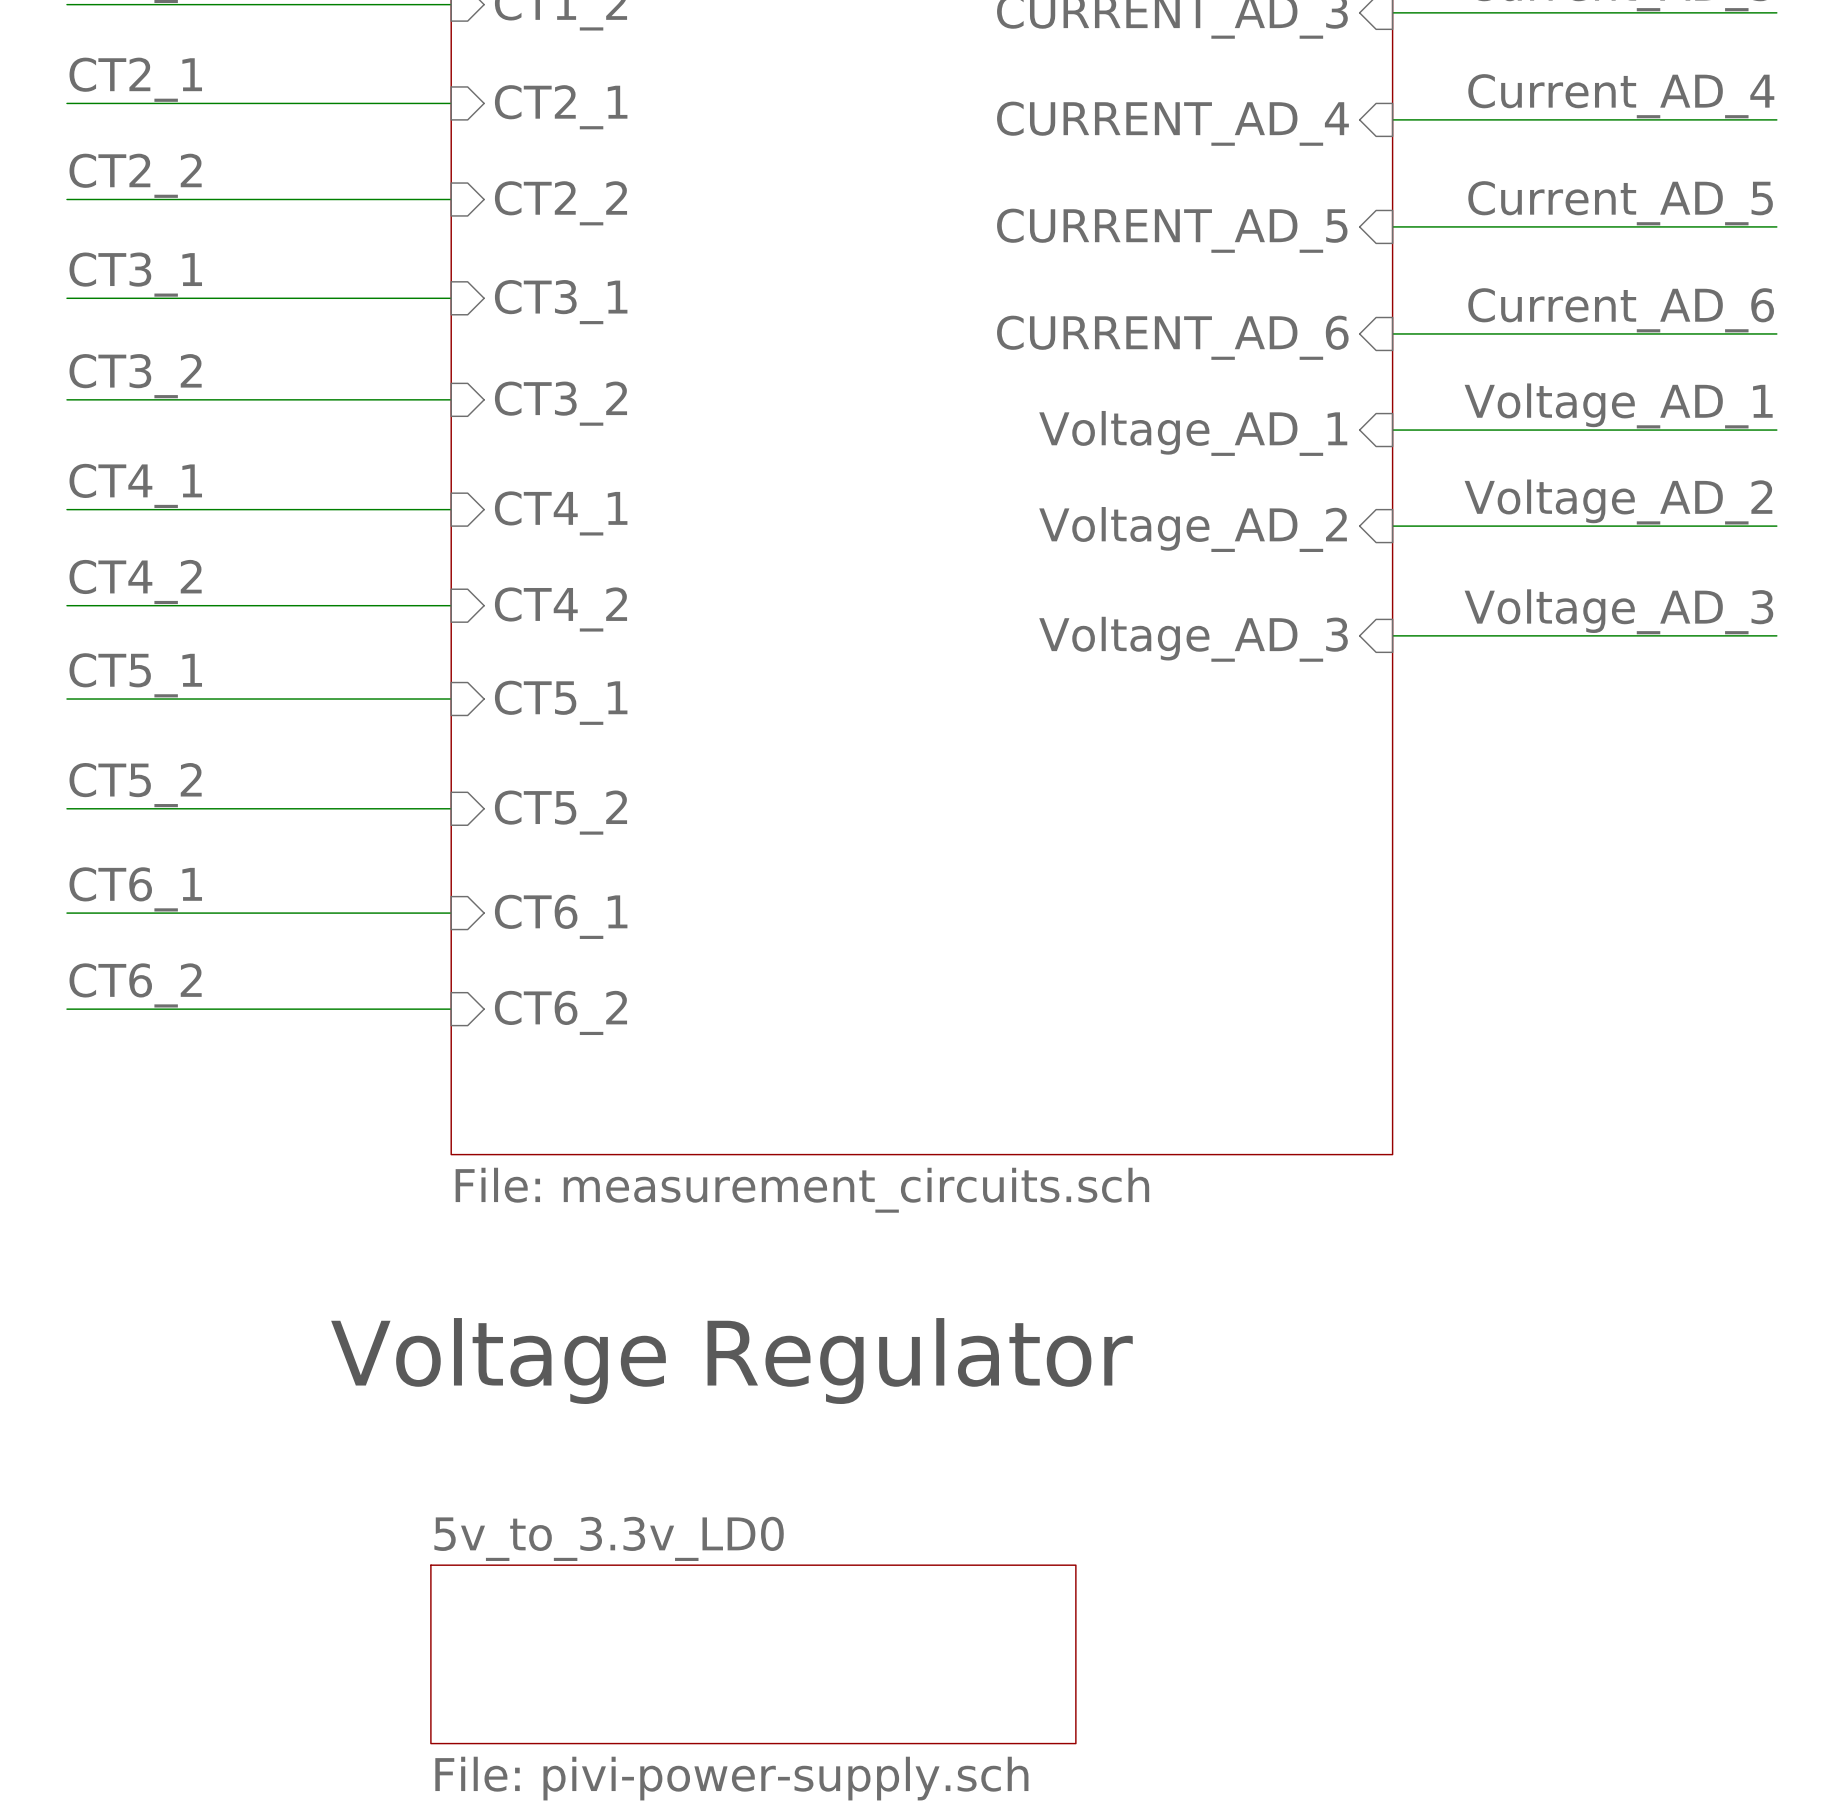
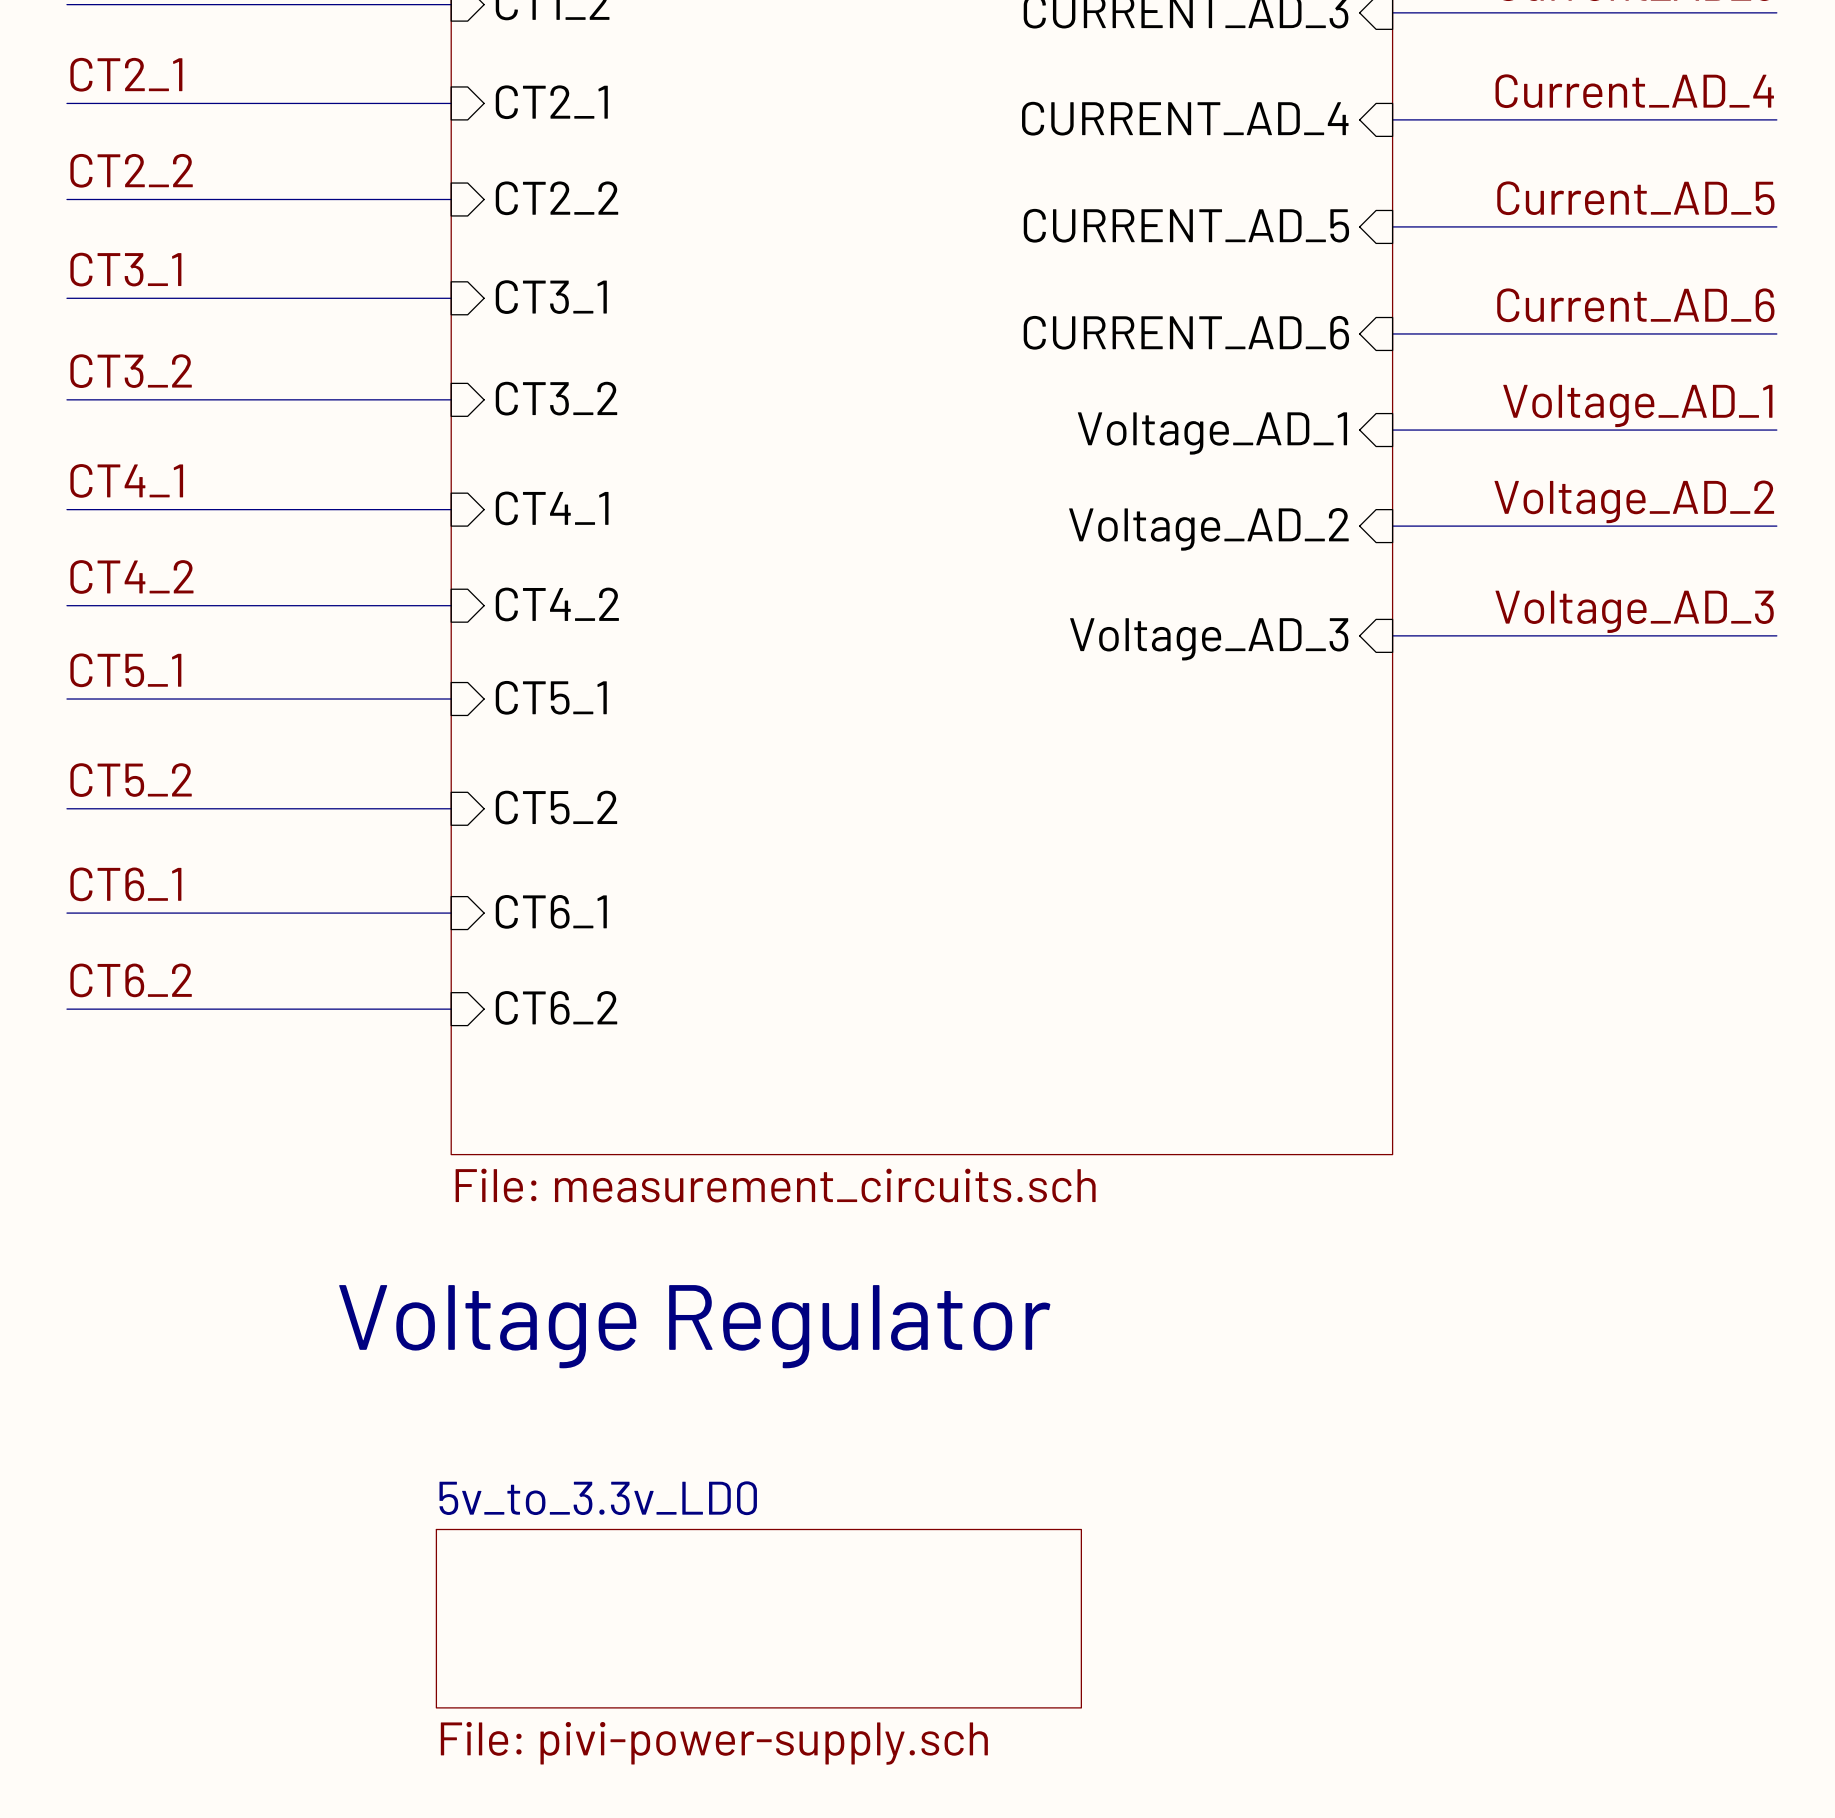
text position: Voltage Regulator (731, 1361) -> Voltage Regulator (694, 1326)
sheet 5v_to_3.3v_LD0 position: (753, 1654) -> (758, 1618)

